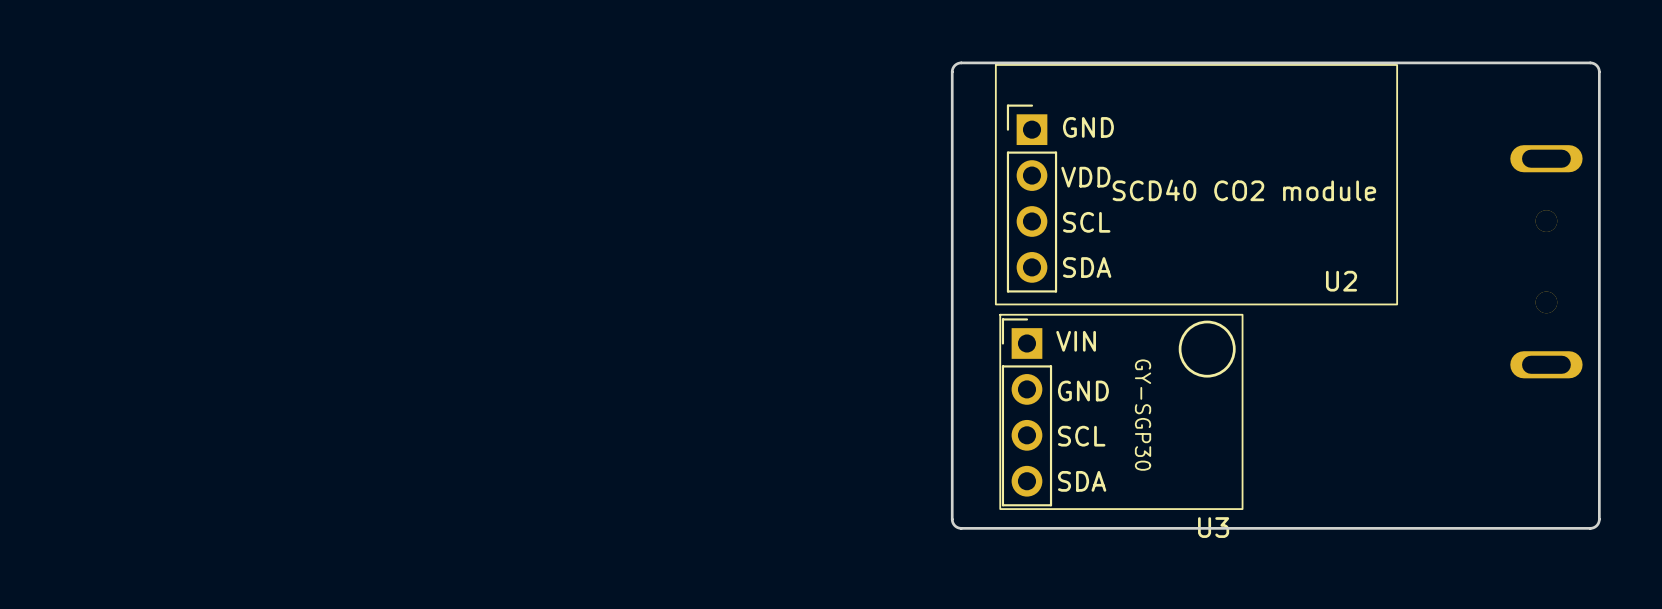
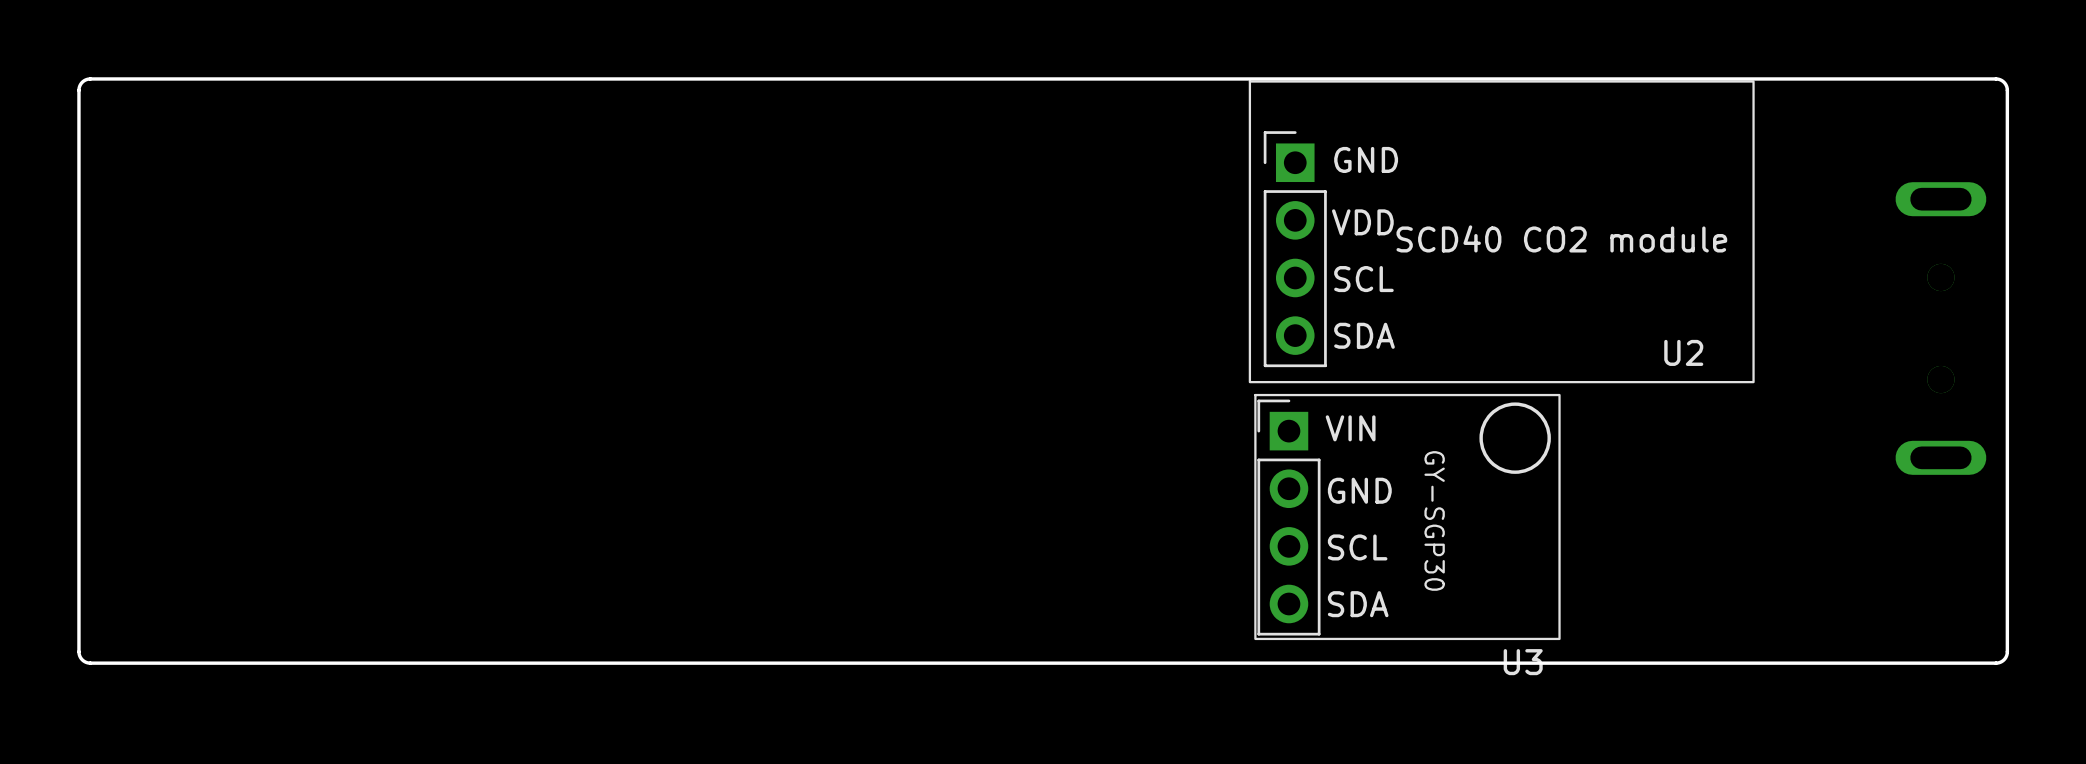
board edge: (961, 62) (954, 65) (952, 71) (952, 519) (954, 525) (961, 528) -> (1206, 78) (85, 80) (80, 84) (78, 90) (78, 651) (82, 659) (90, 663) (1206, 663)

